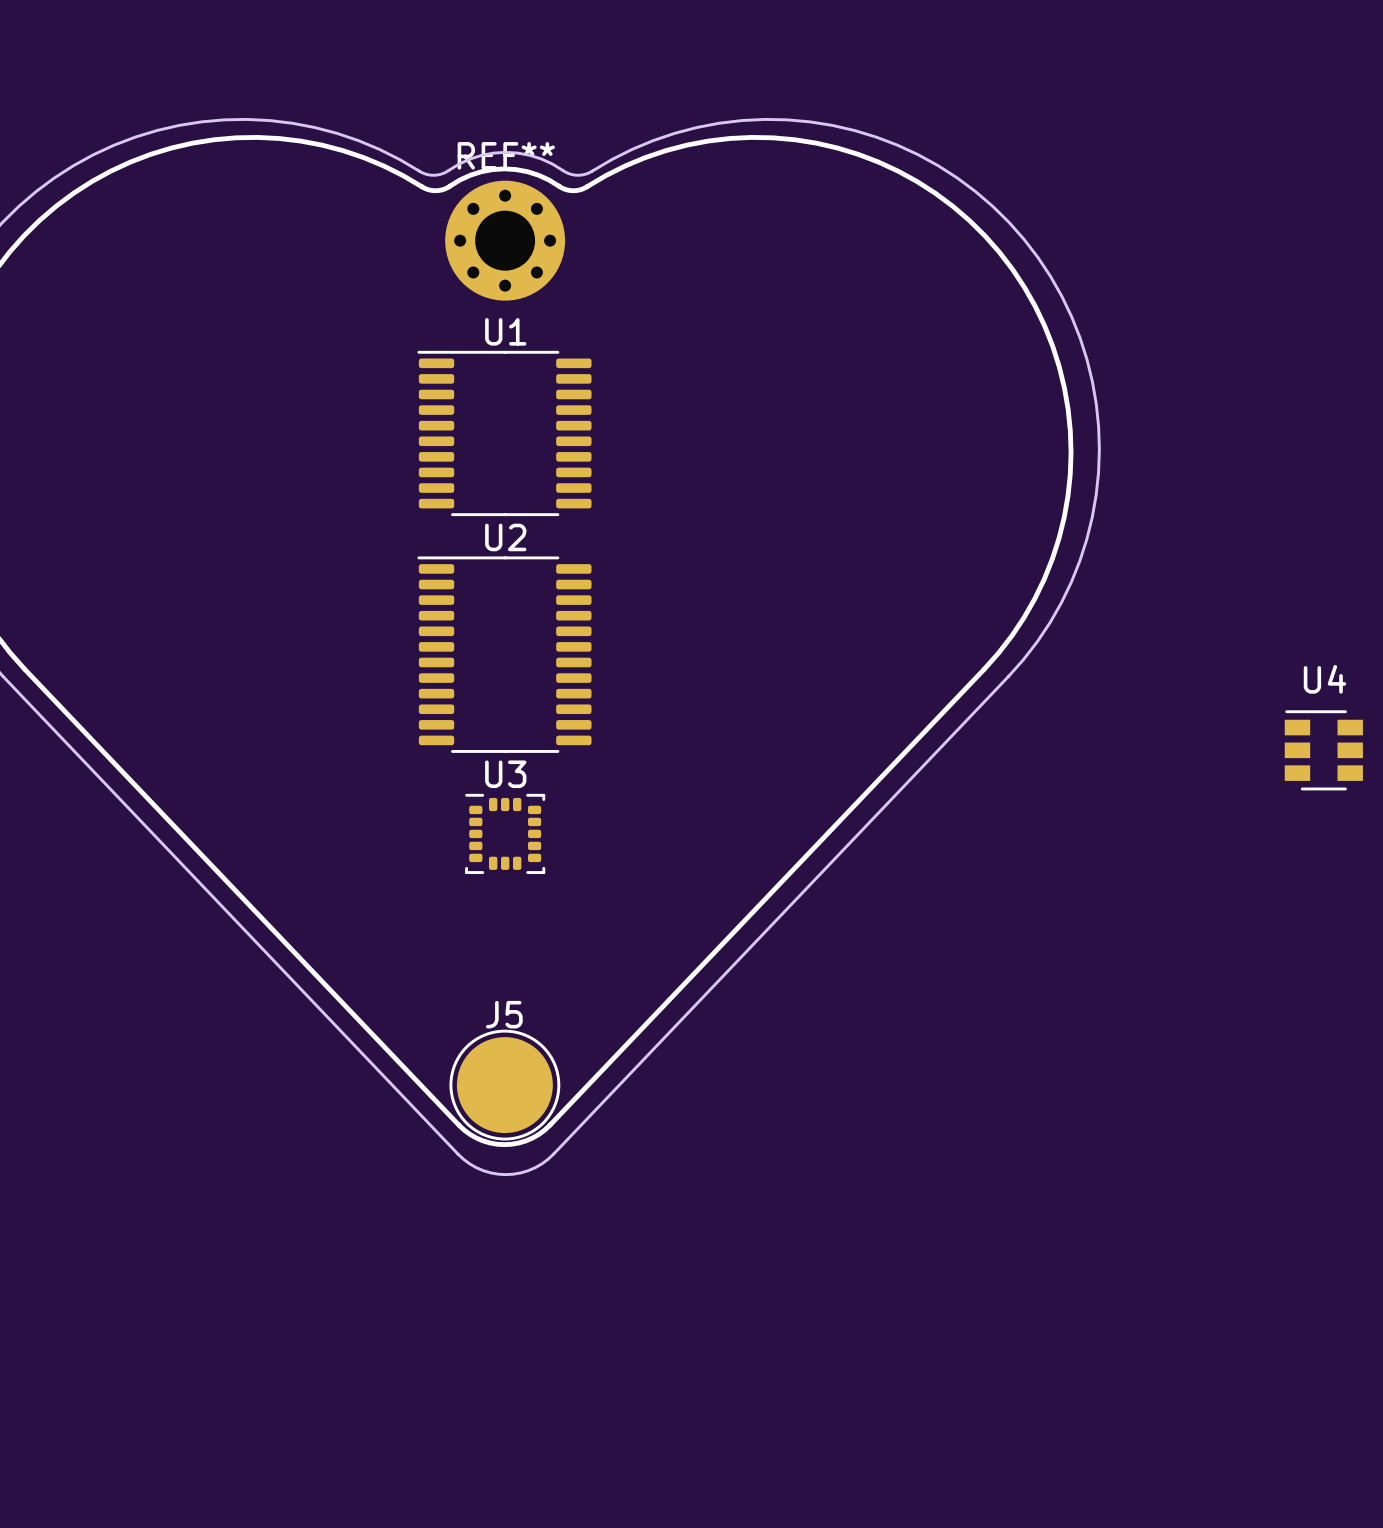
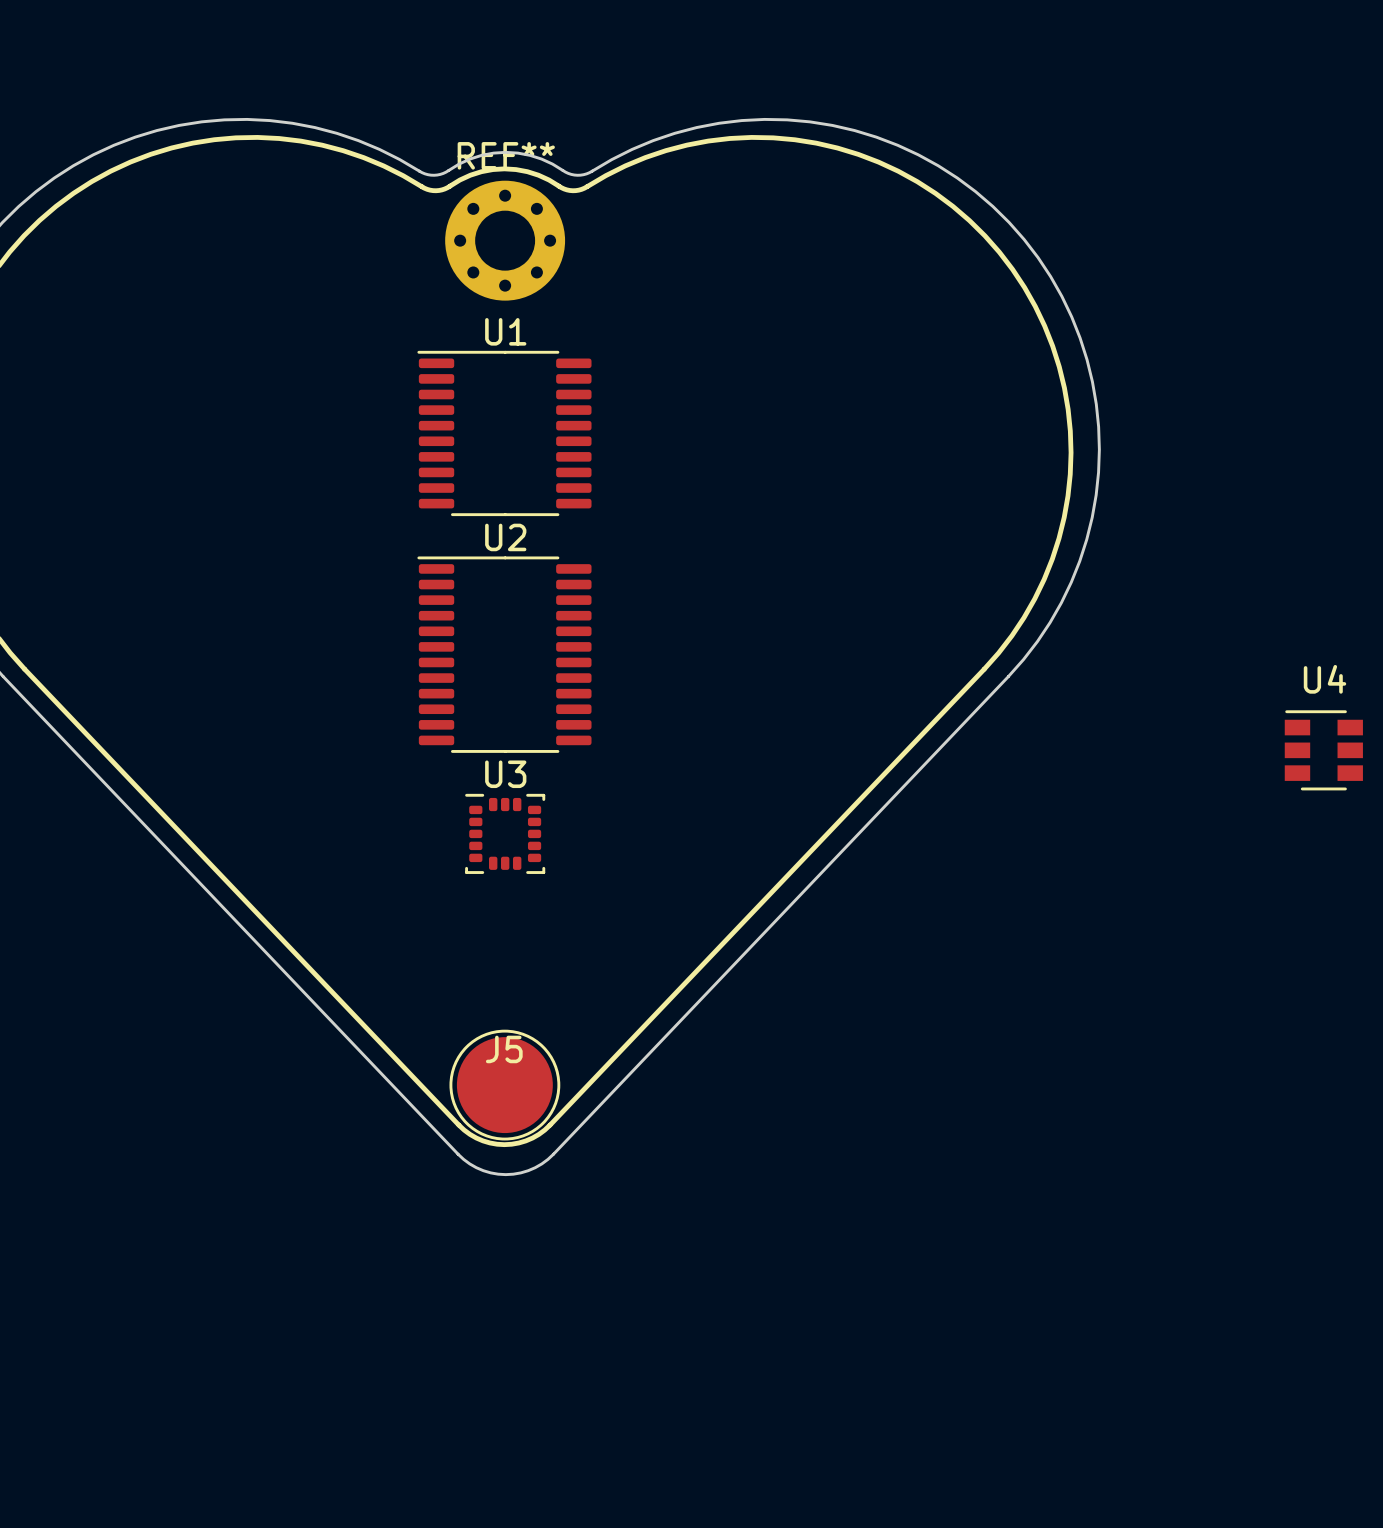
J5 name position: J5 (504, 1014) -> J5 (504, 1049)

